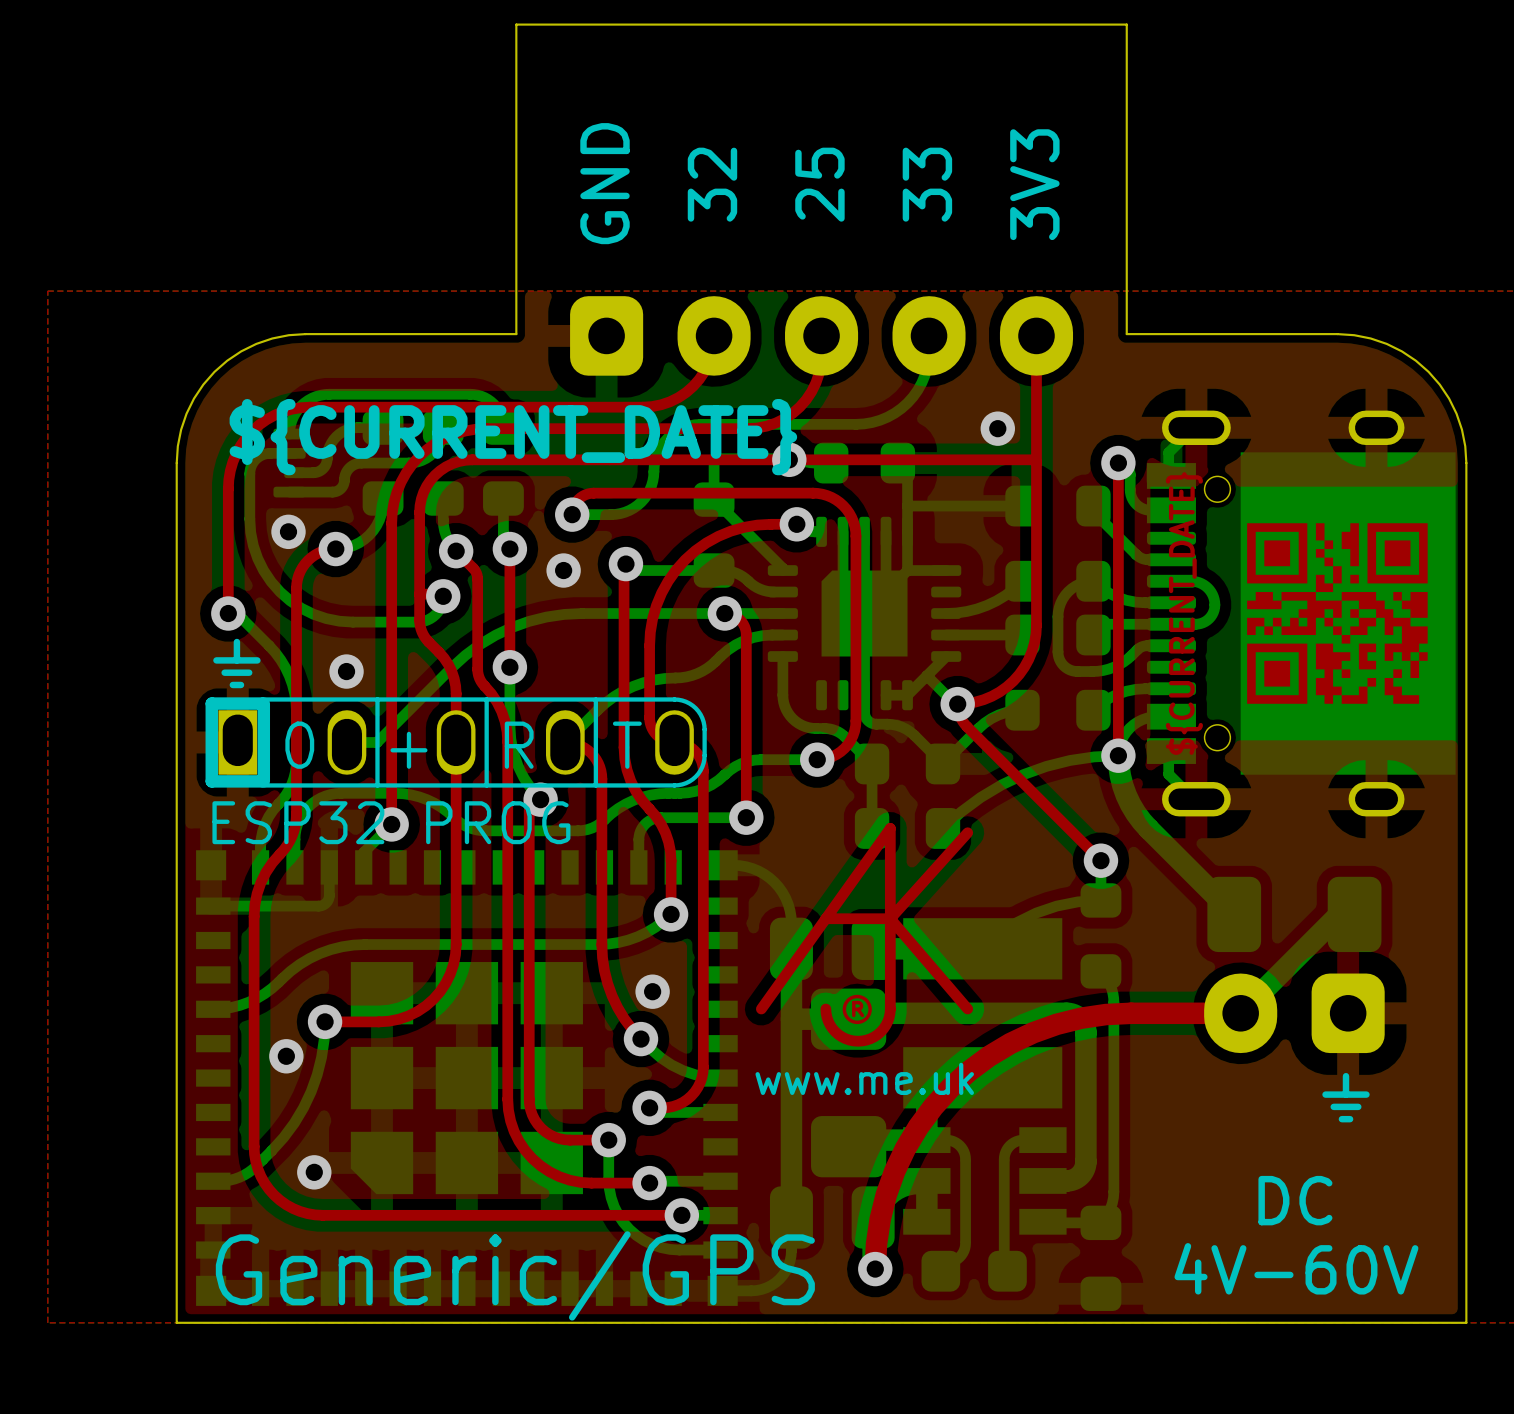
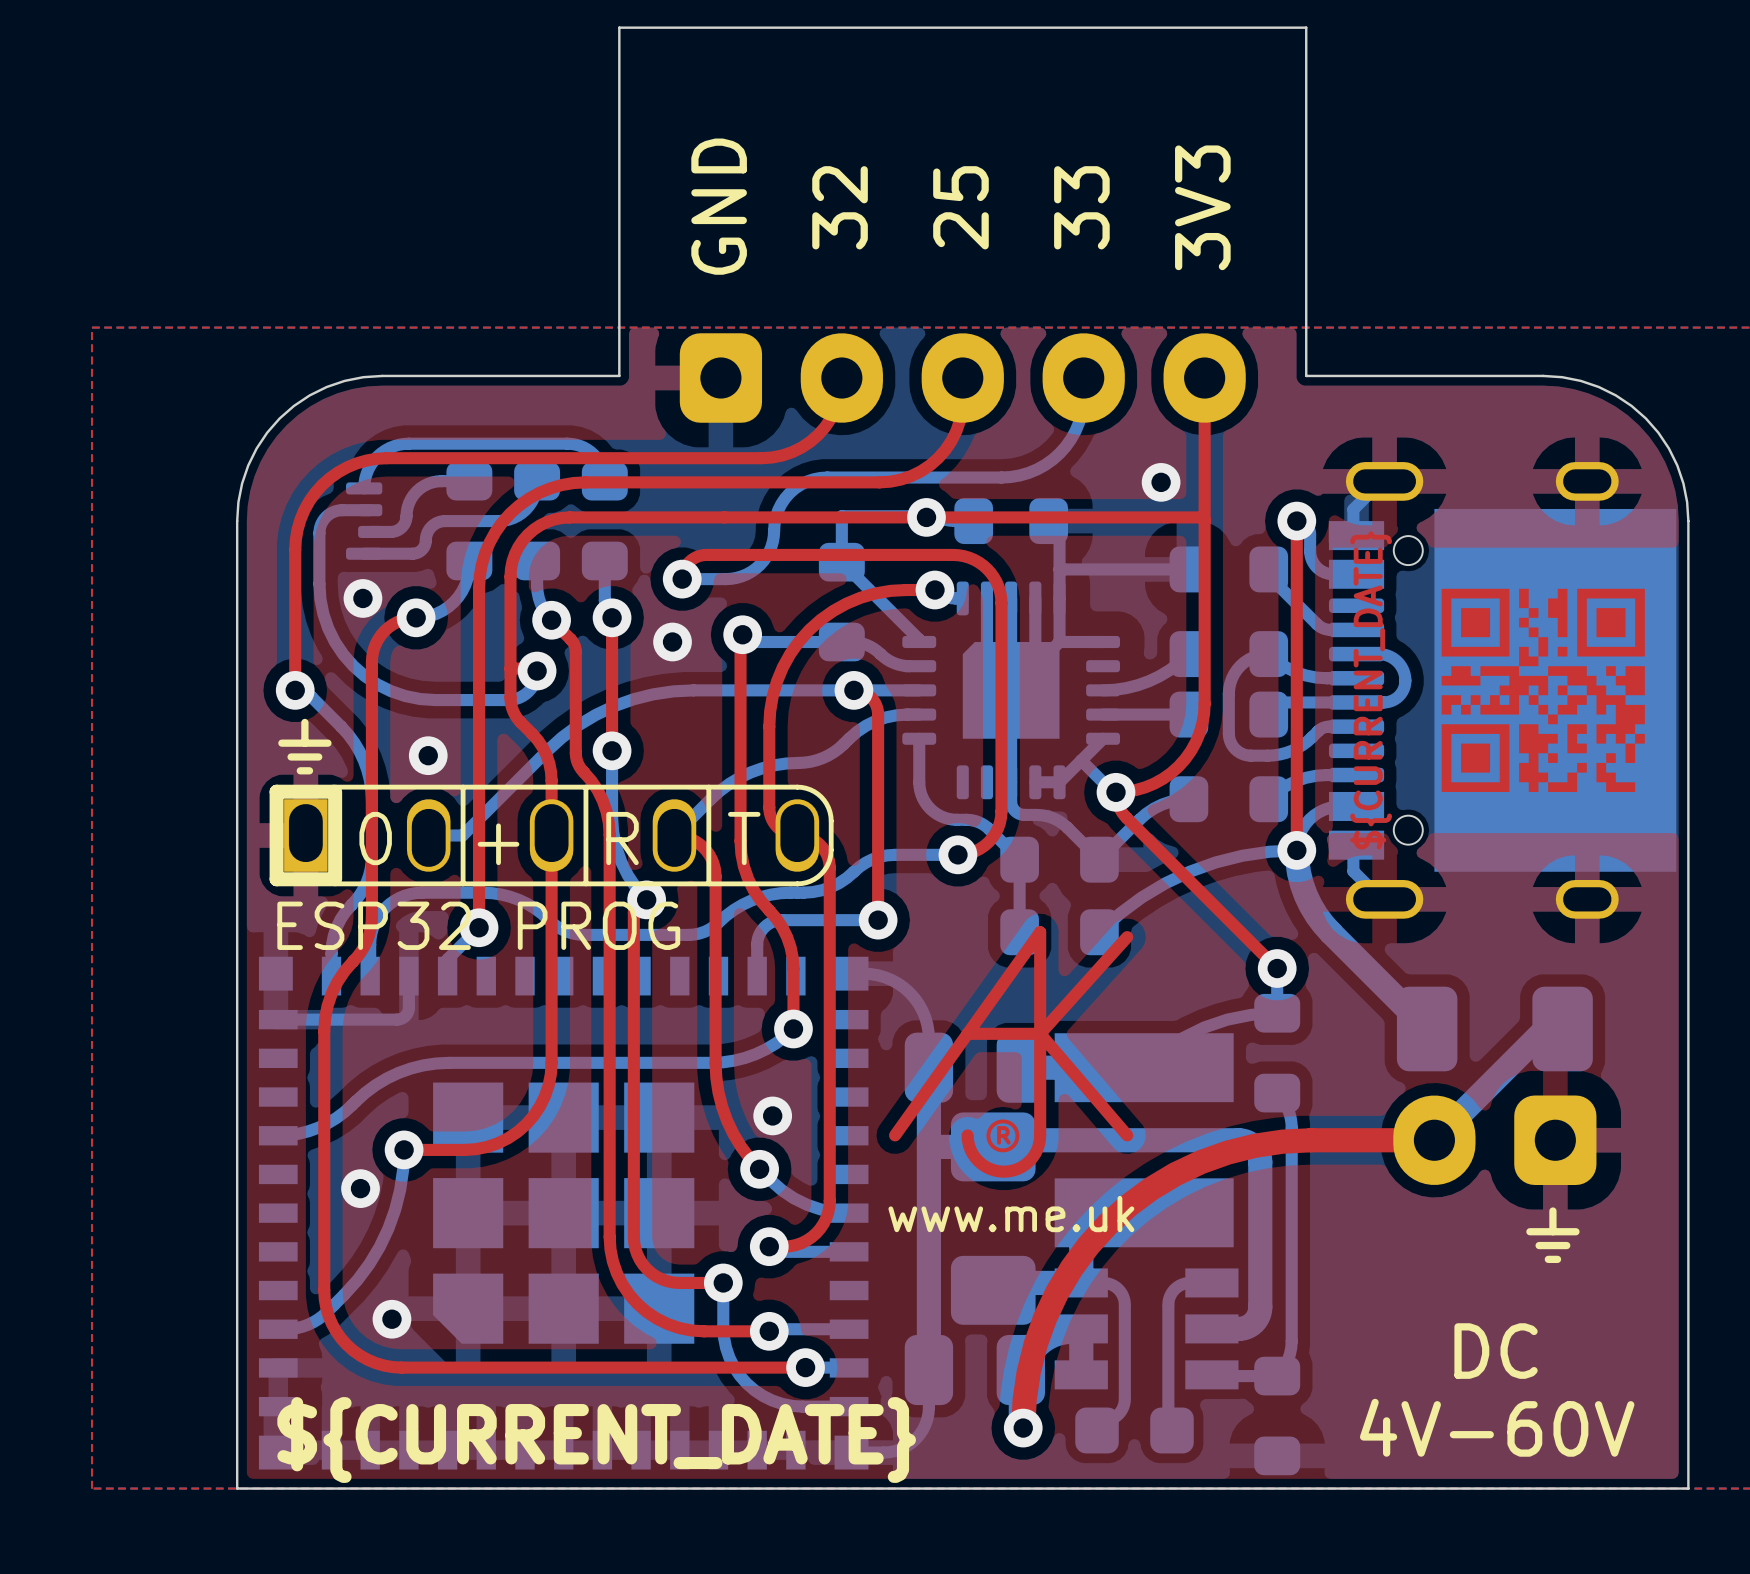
text: ${CURRENT_DATE} (513, 437) -> none
text: Generic/GPS (515, 1275) -> ${CURRENT_DATE} (596, 1440)

